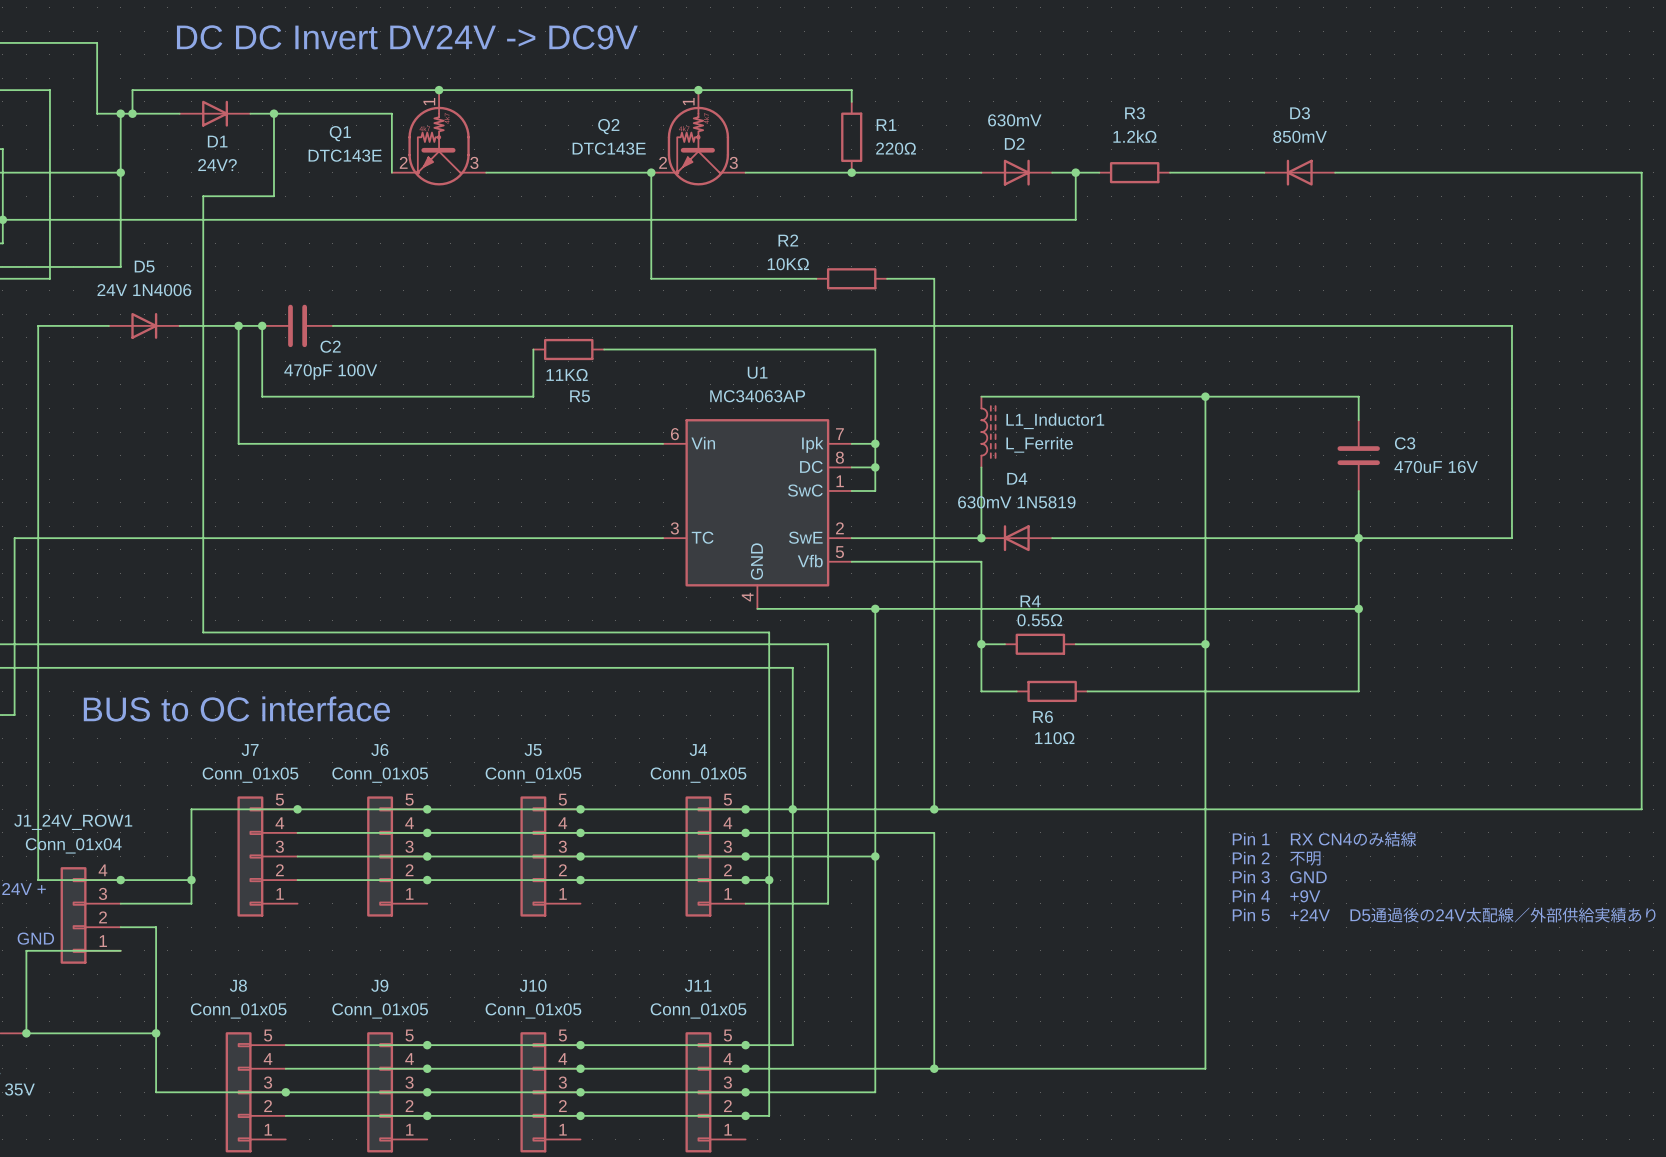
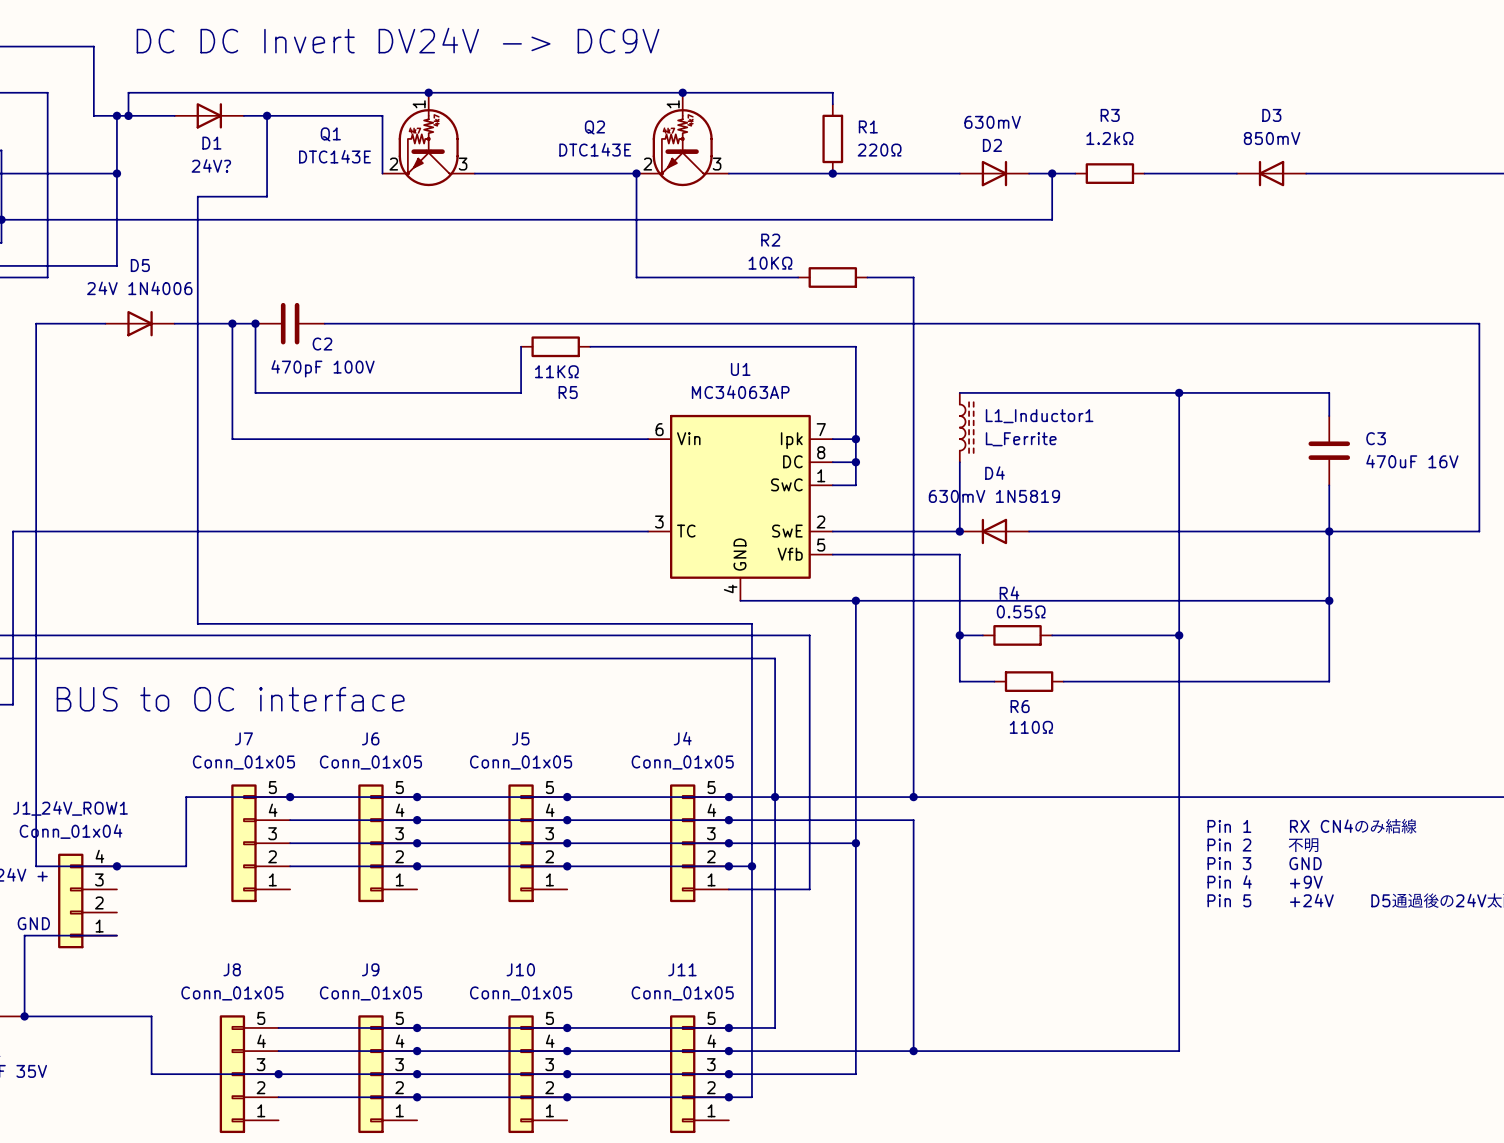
wire: (191, 880) (191, 903) (120, 903) -> none
junction: (191, 880) -> none
wire: (120, 927) (156, 927) (156, 1033) -> none
junction: (156, 1033) -> none

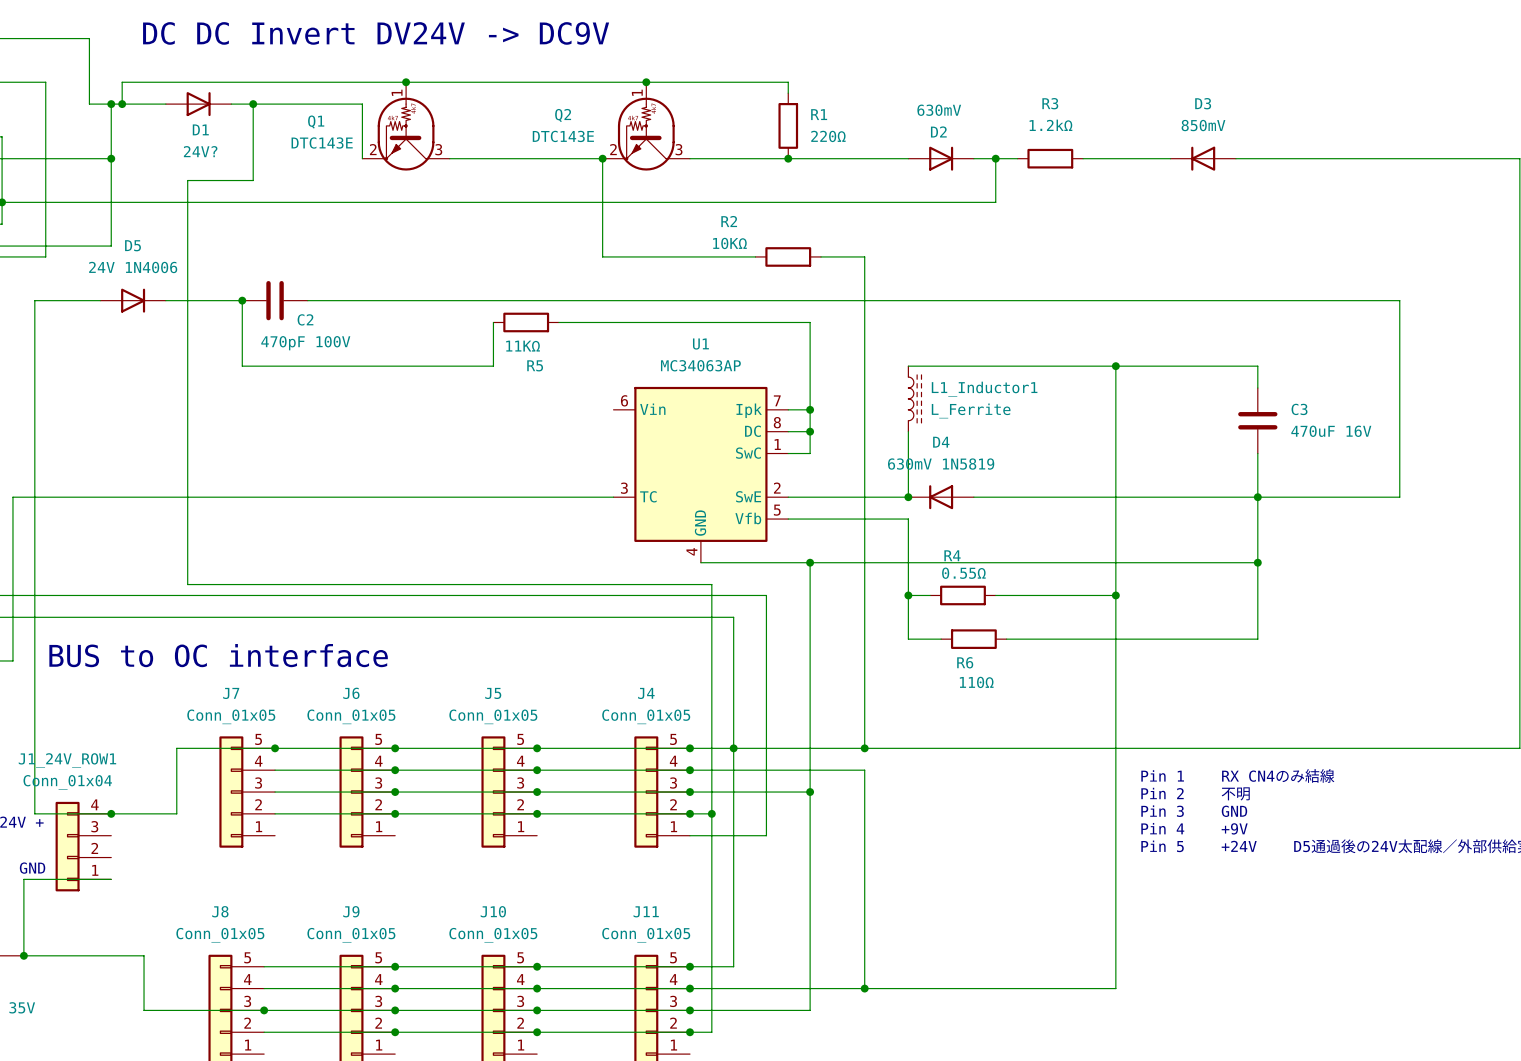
wire: (232, 323) (232, 439) (648, 439) -> none
junction: (232, 323) -> none

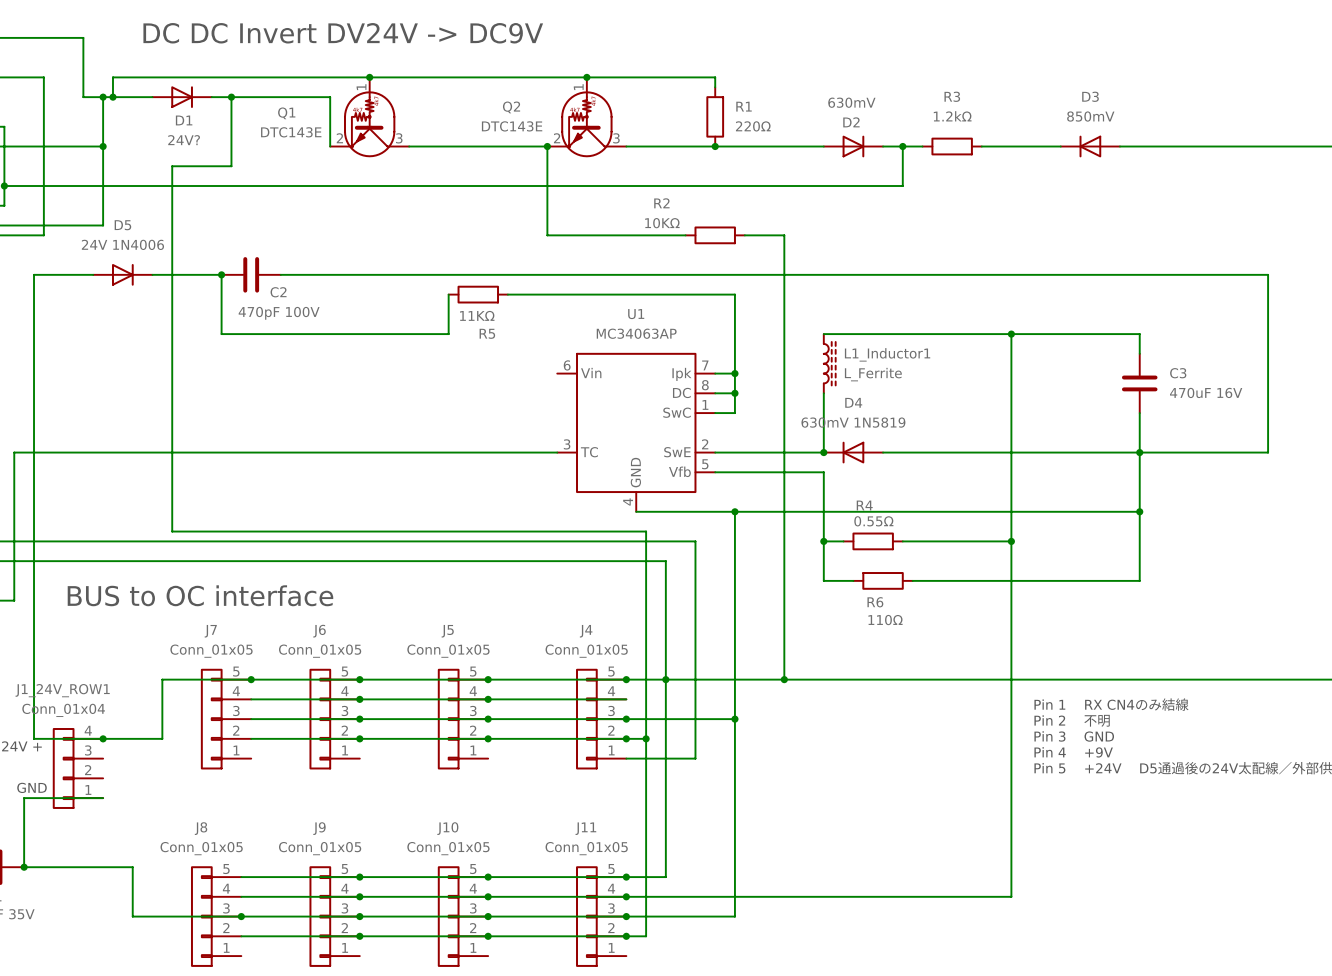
wire: (689, 770) (864, 770) (864, 988) -> none
junction: (689, 770) -> none
junction: (864, 988) -> none

